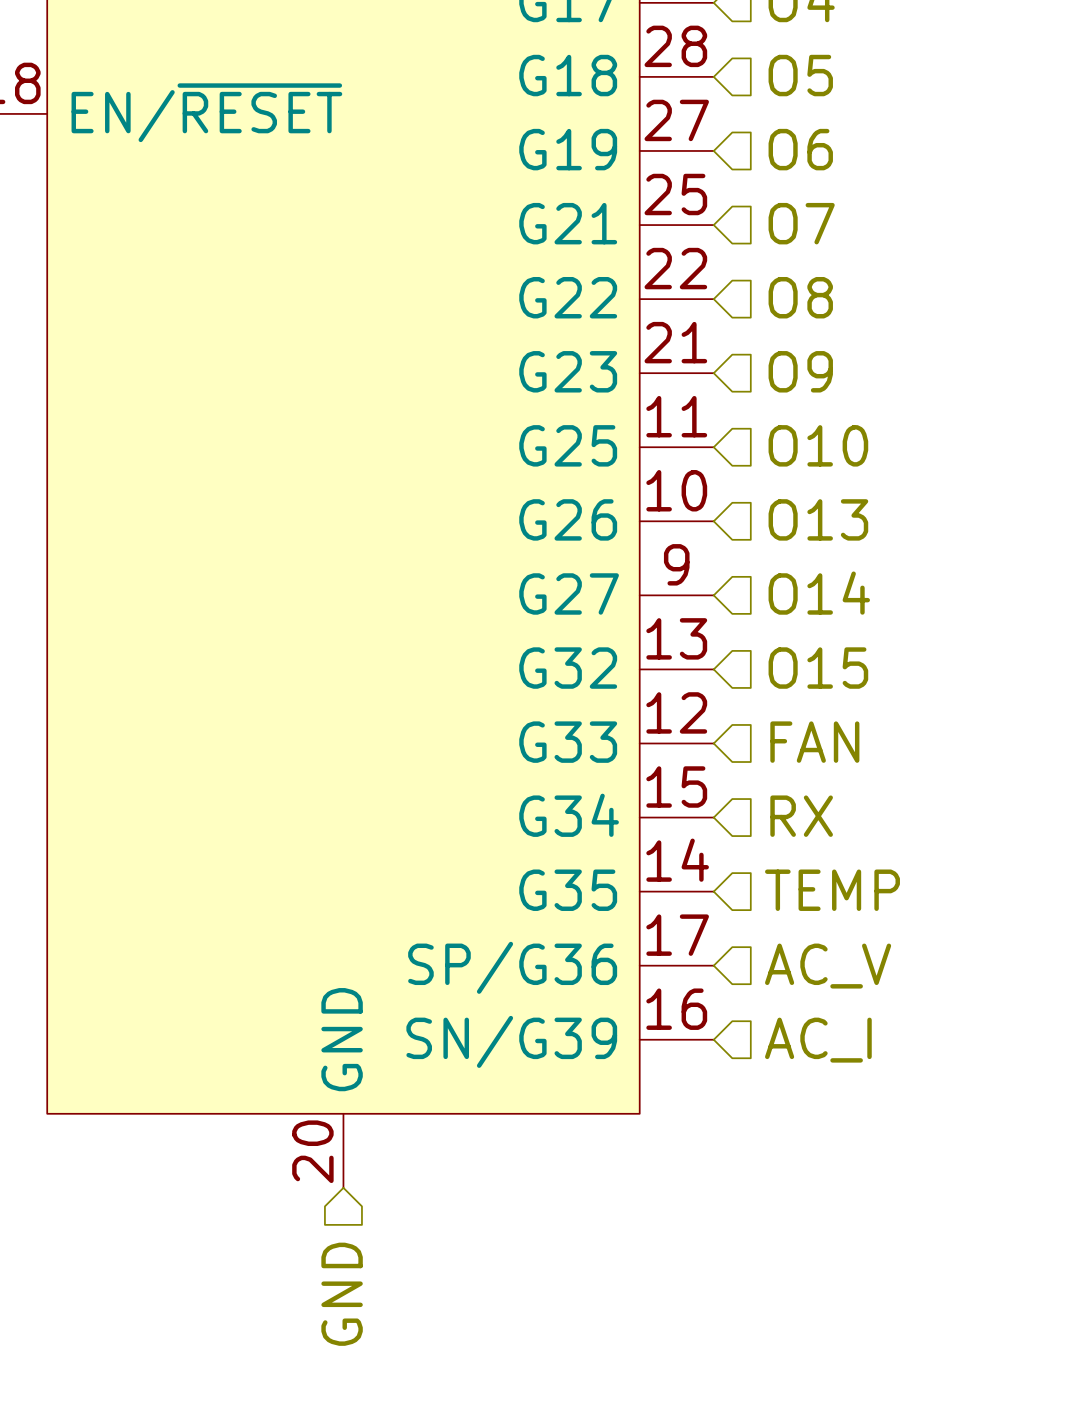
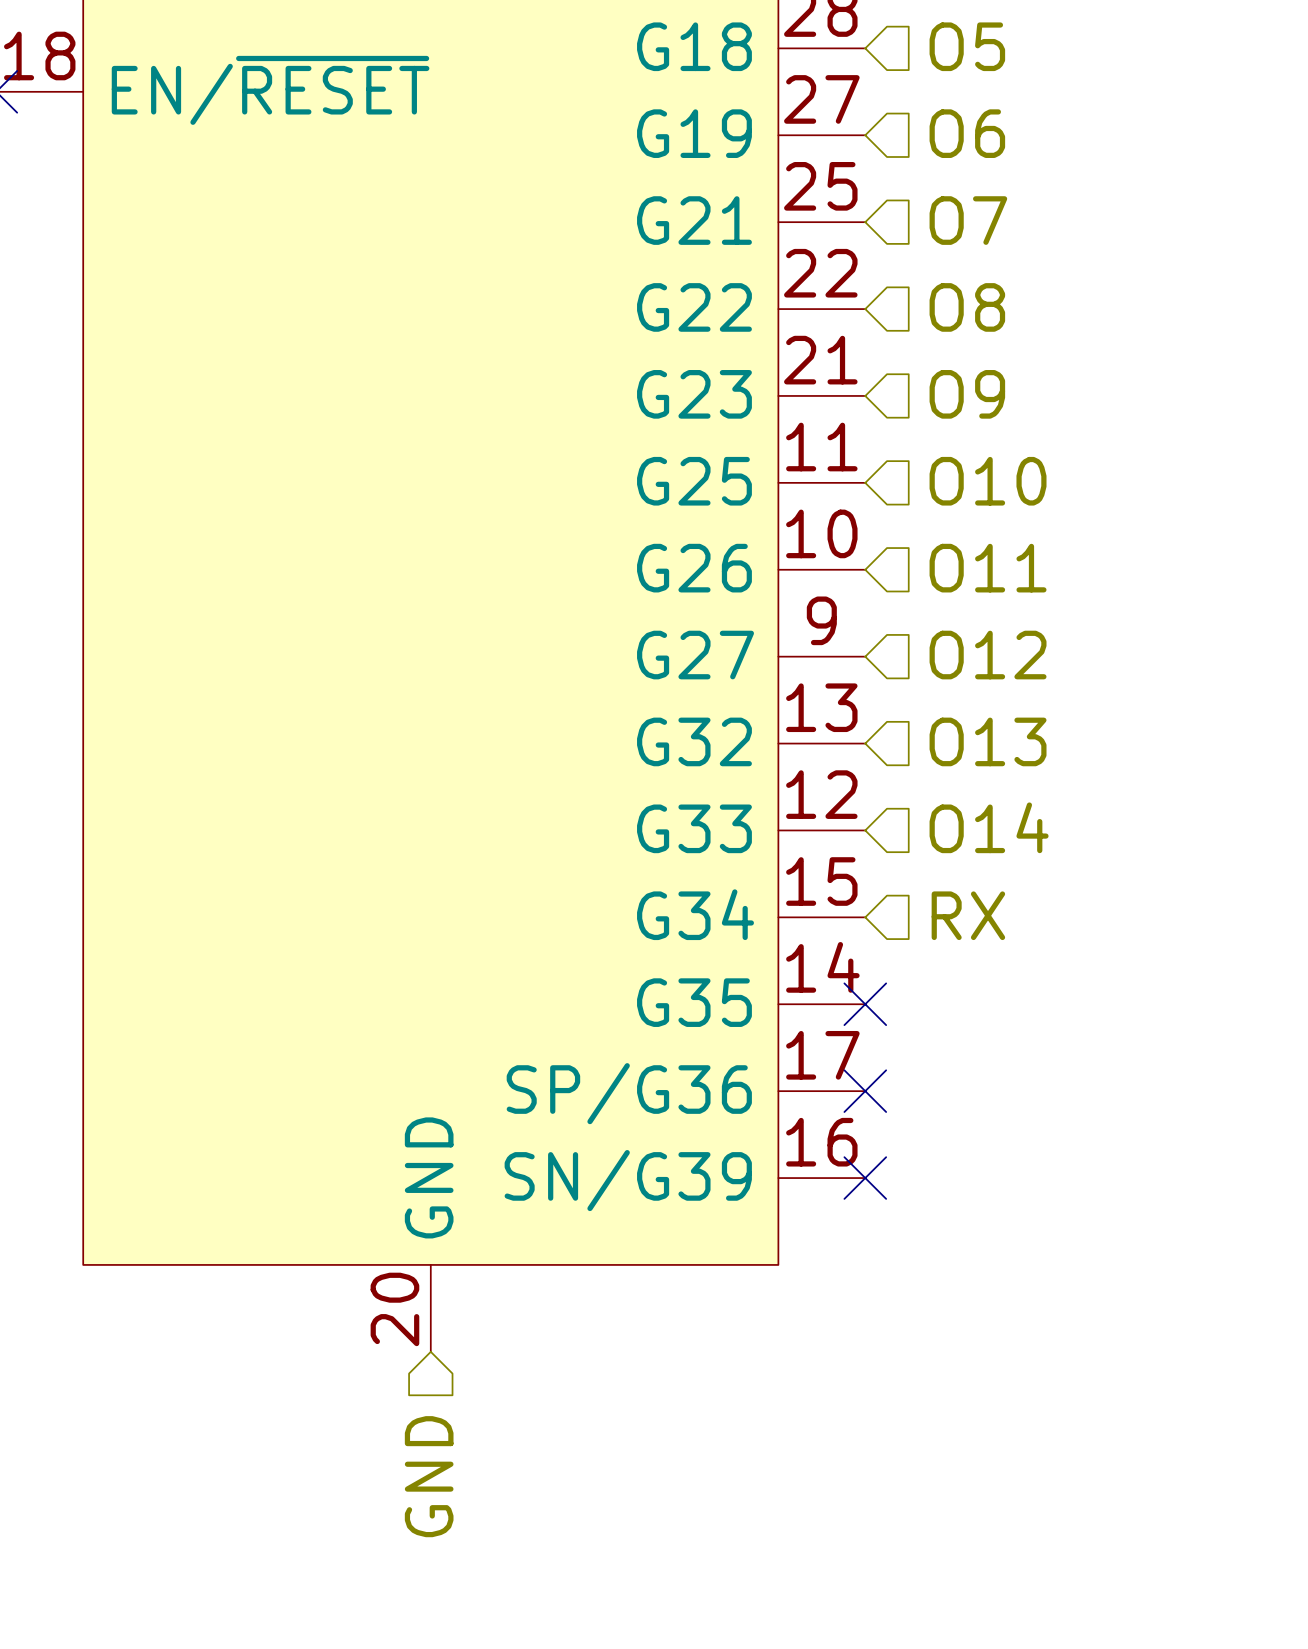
hierarchical label: O13 (818, 519) -> O11 (988, 568)
hierarchical label: O14 (819, 593) -> O12 (988, 655)
hierarchical label: O15 (818, 668) -> O13 (988, 741)
hierarchical label: FAN (814, 742) -> O14 (989, 827)
hierarchical label: TEMP (832, 890) -> none
no-connect mark: none -> (865, 1004)
no-connect mark: none -> (865, 1091)
hierarchical label: AC_V (828, 966) -> none
no-connect mark: none -> (865, 1178)
hierarchical label: AC_I (818, 1040) -> none

